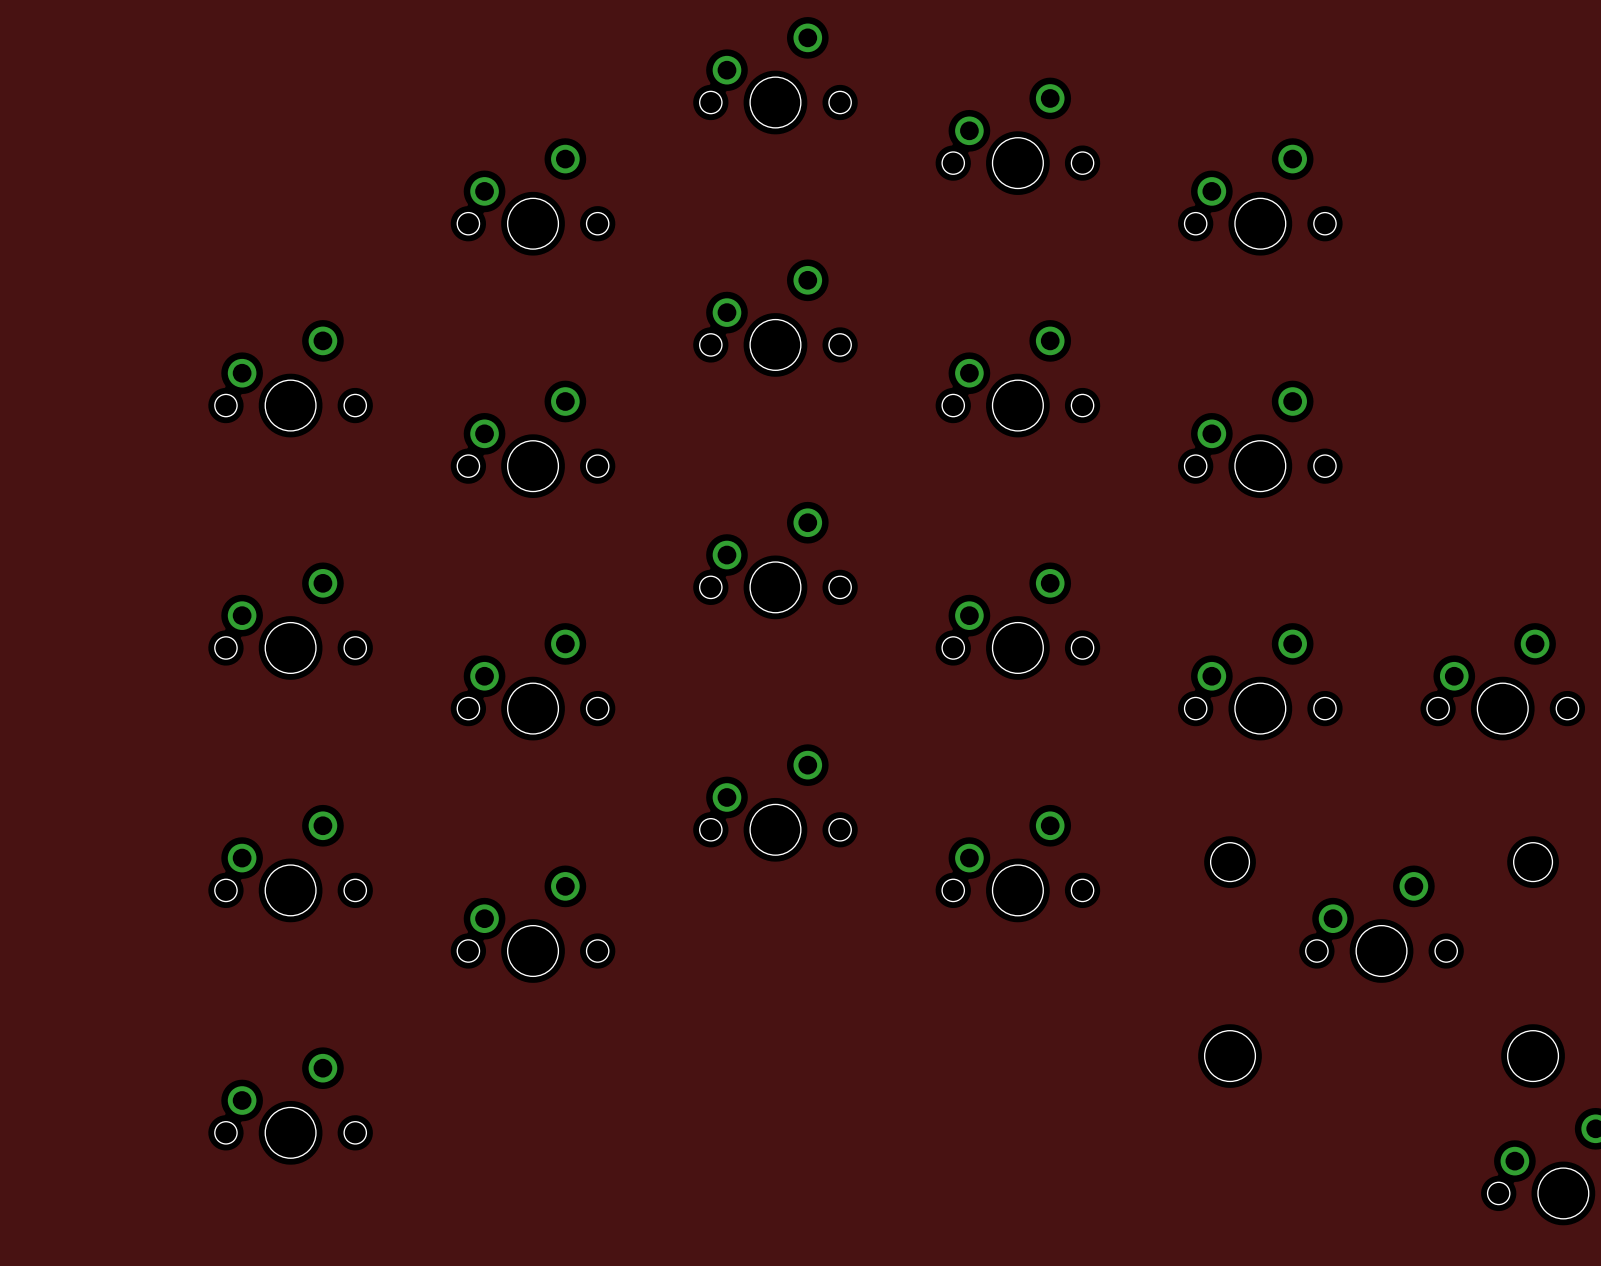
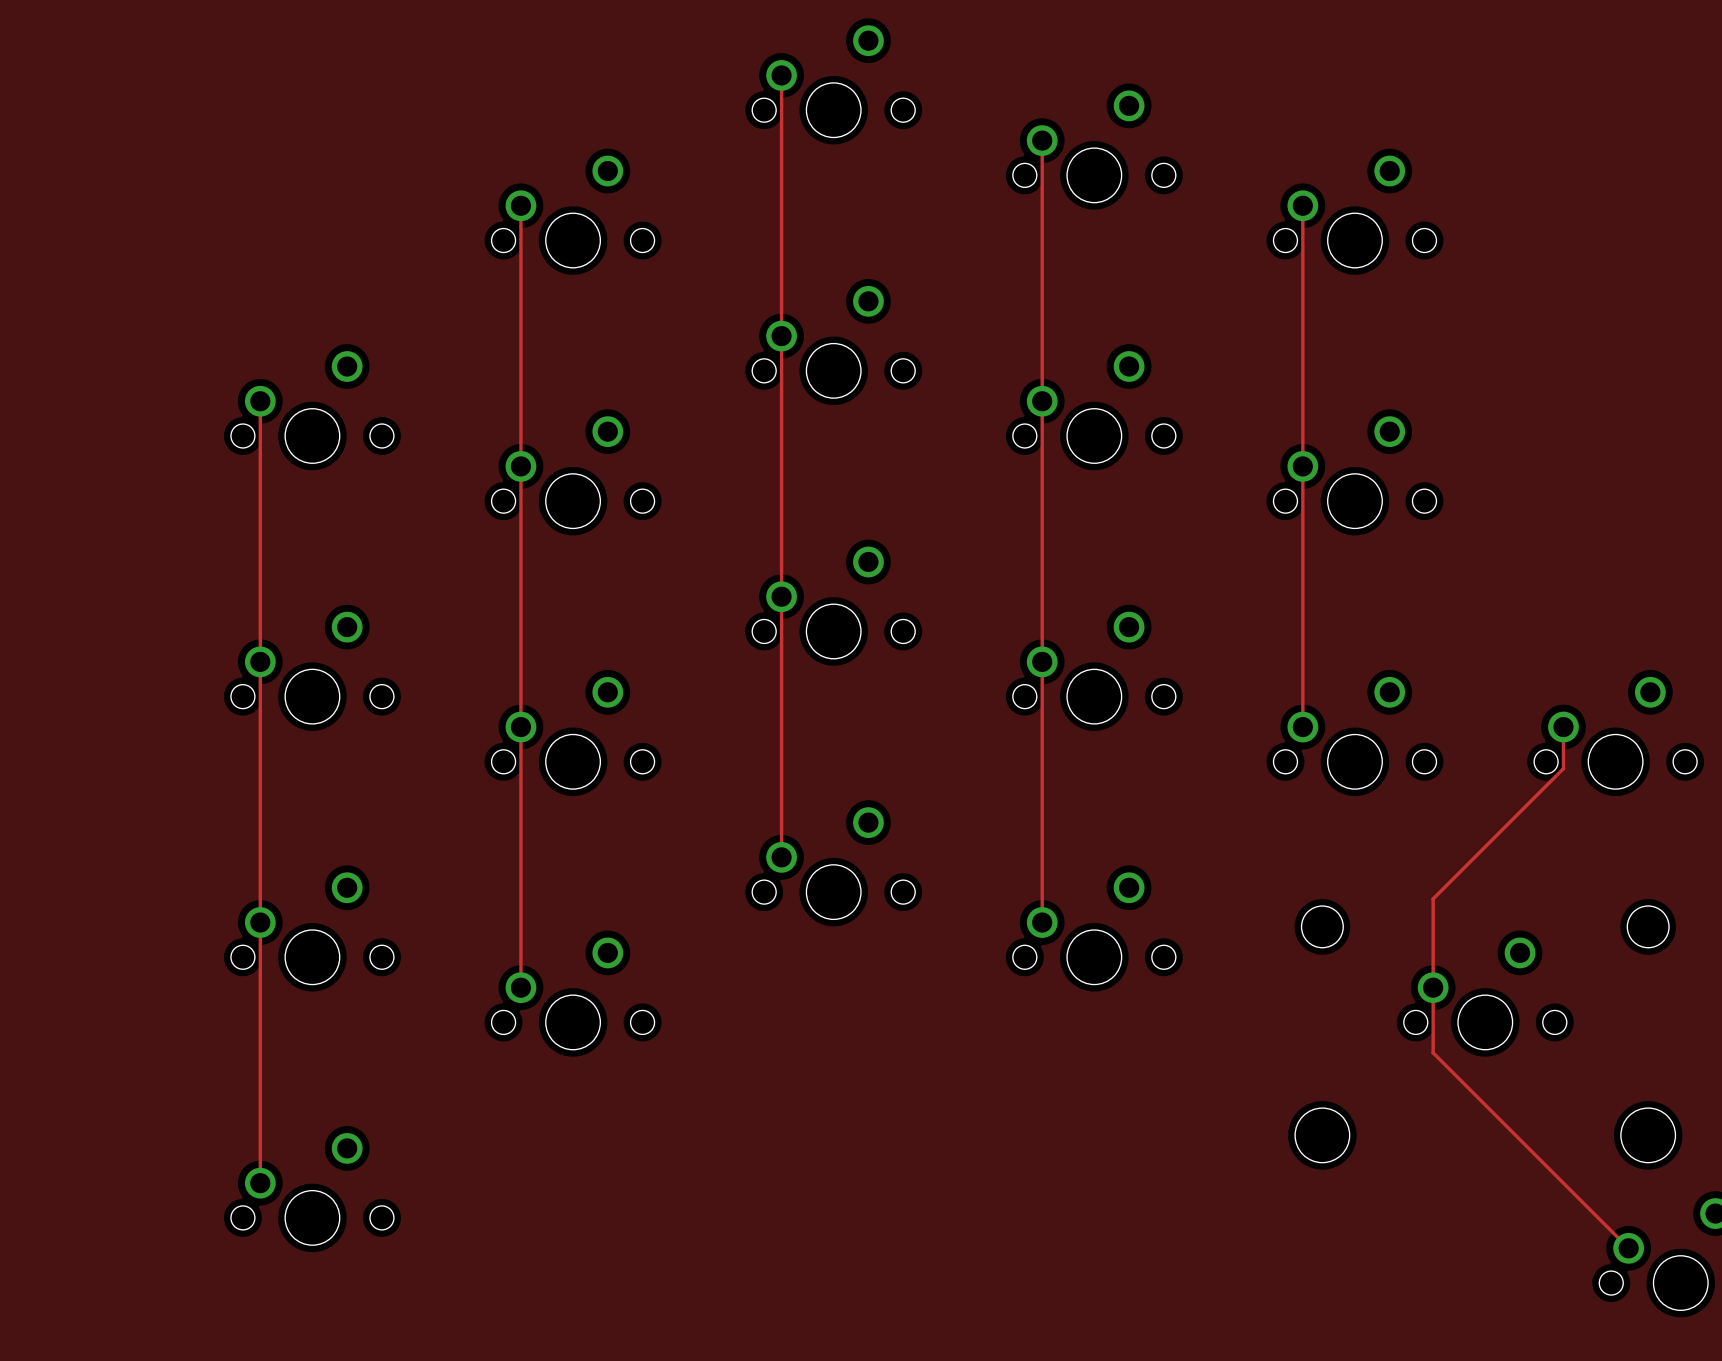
track: none -> (781, 75) (781, 857)
track: none -> (1042, 140) (1042, 922)
track: none -> (520, 205) (520, 987)
track: none -> (1302, 205) (1302, 727)
track: none -> (260, 401) (260, 1183)
track: none -> (1563, 727) (1563, 768) (1433, 898) (1433, 1052) (1628, 1248)

